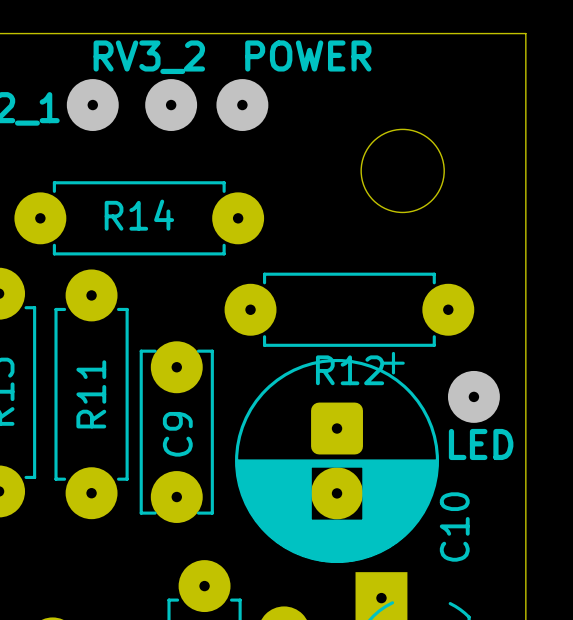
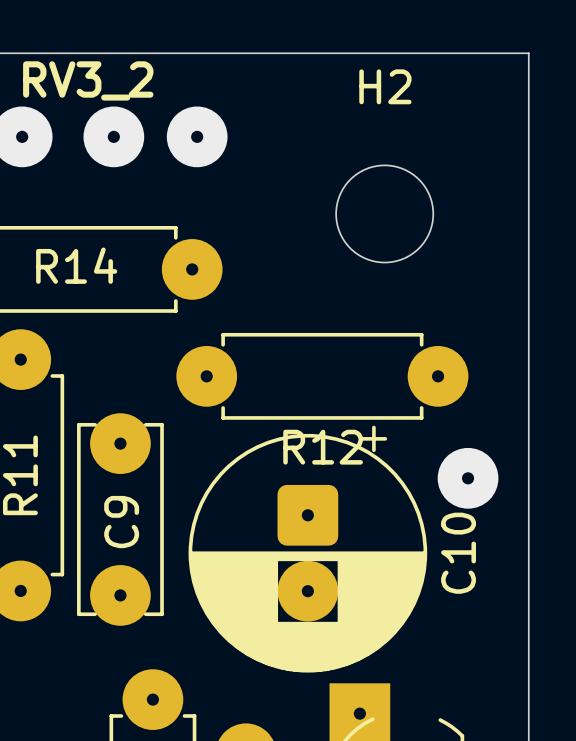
text: POWER (308, 55) -> none
H2 name: none -> H2 (385, 86)
text: LED (481, 444) -> none
C10 name position: C10 (454, 526) -> C10 (458, 553)

